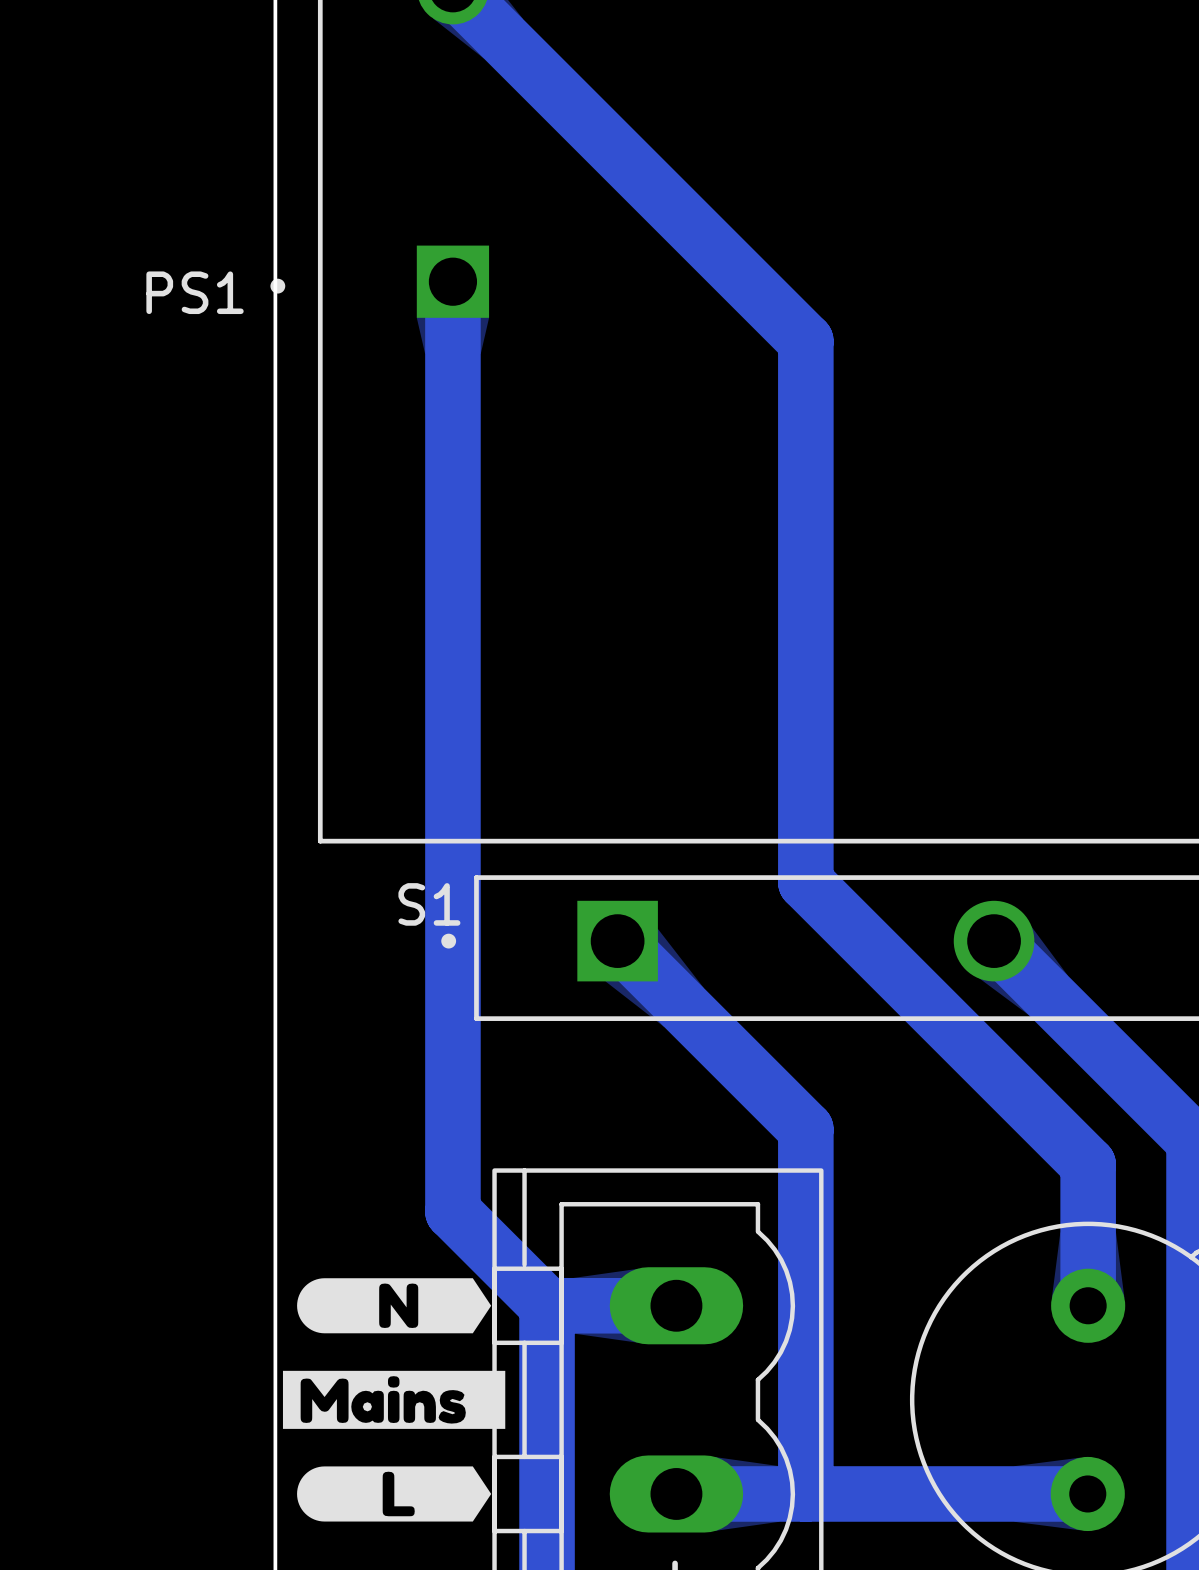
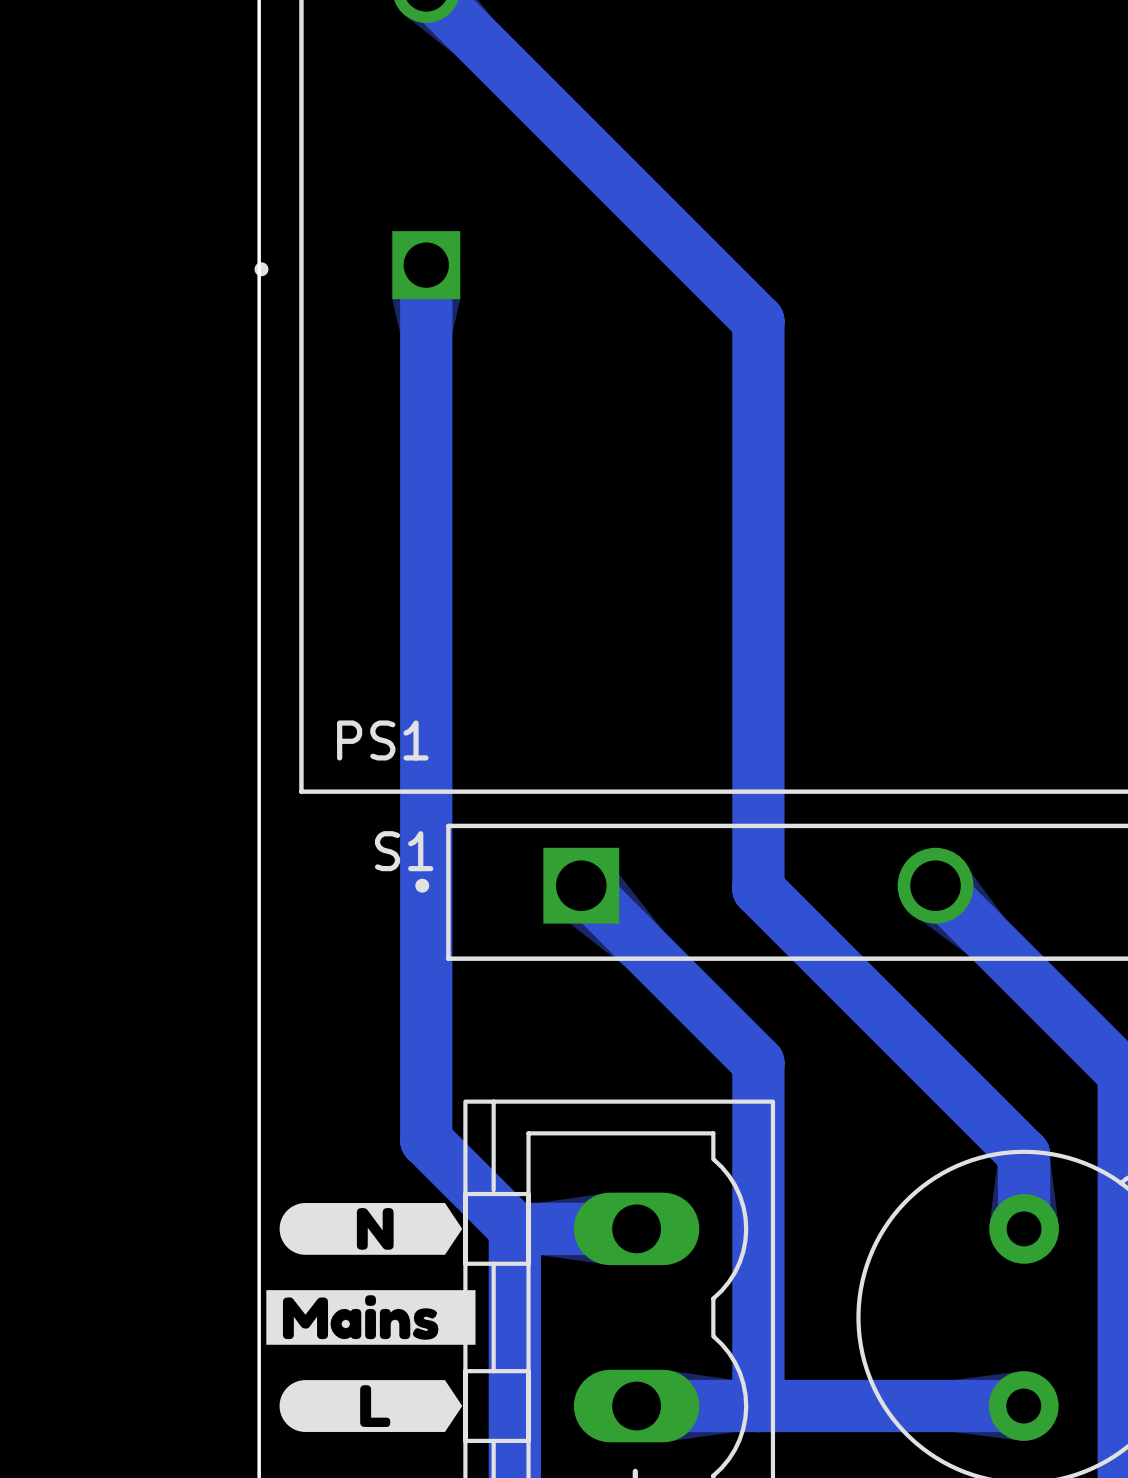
PS1 name position: PS1 (195, 292) -> PS1 (382, 740)
bottom track: (805, 882) (1088, 1164) (1088, 1227) -> (758, 830) (758, 889) (1024, 1154)

